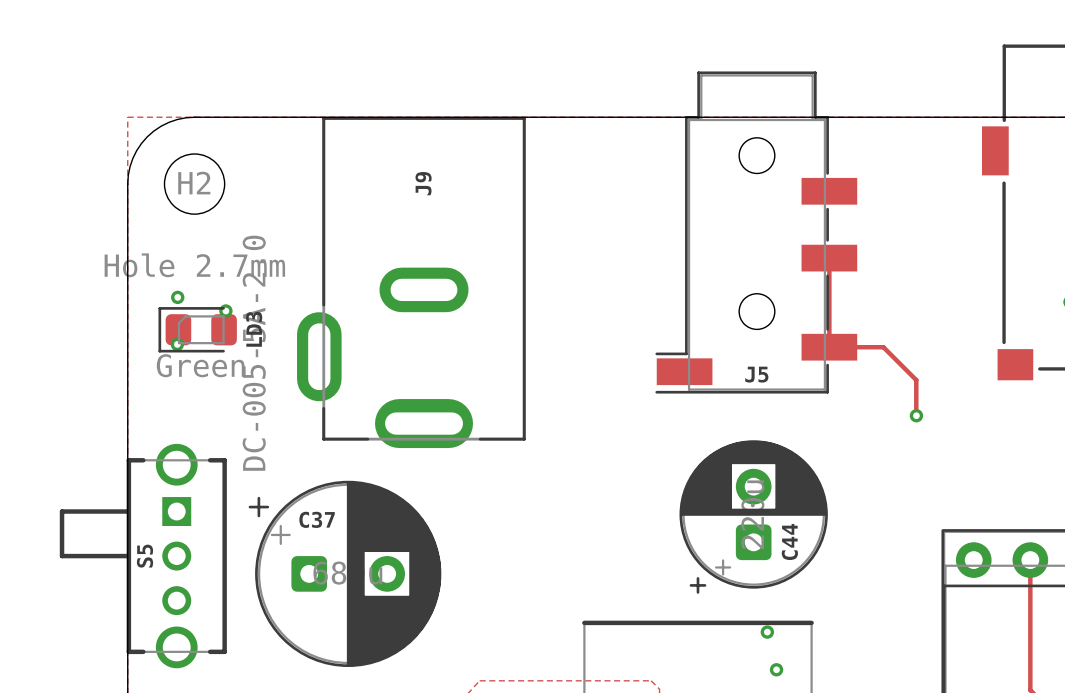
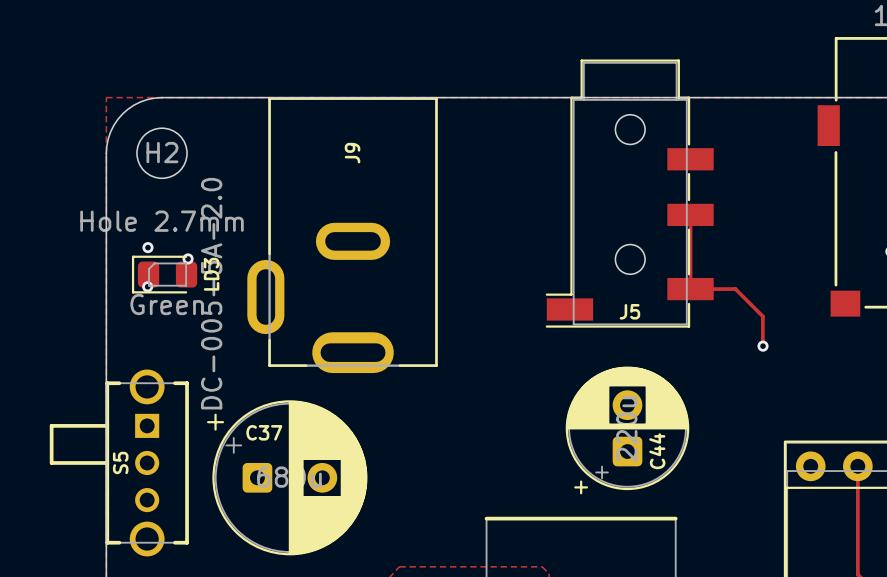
via: (767, 632) -> none
via: (776, 669) -> none

